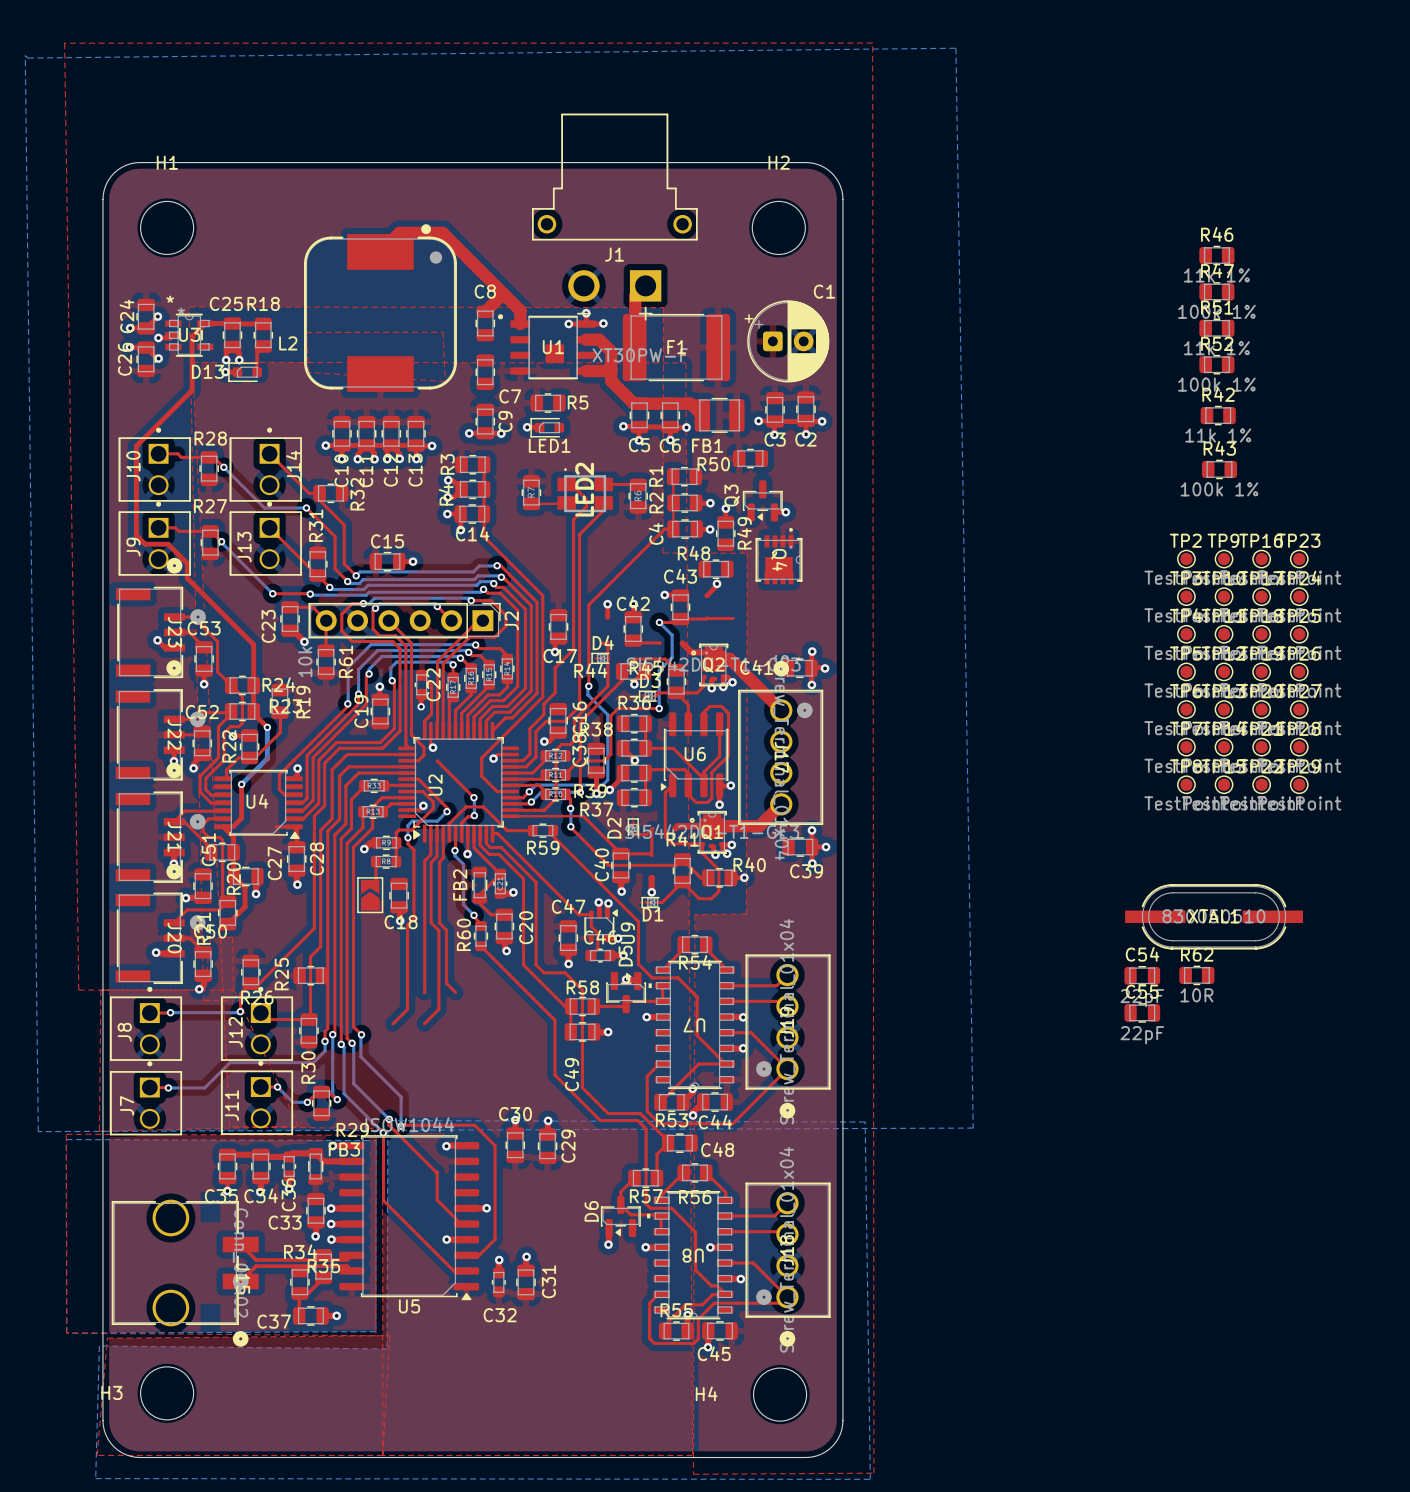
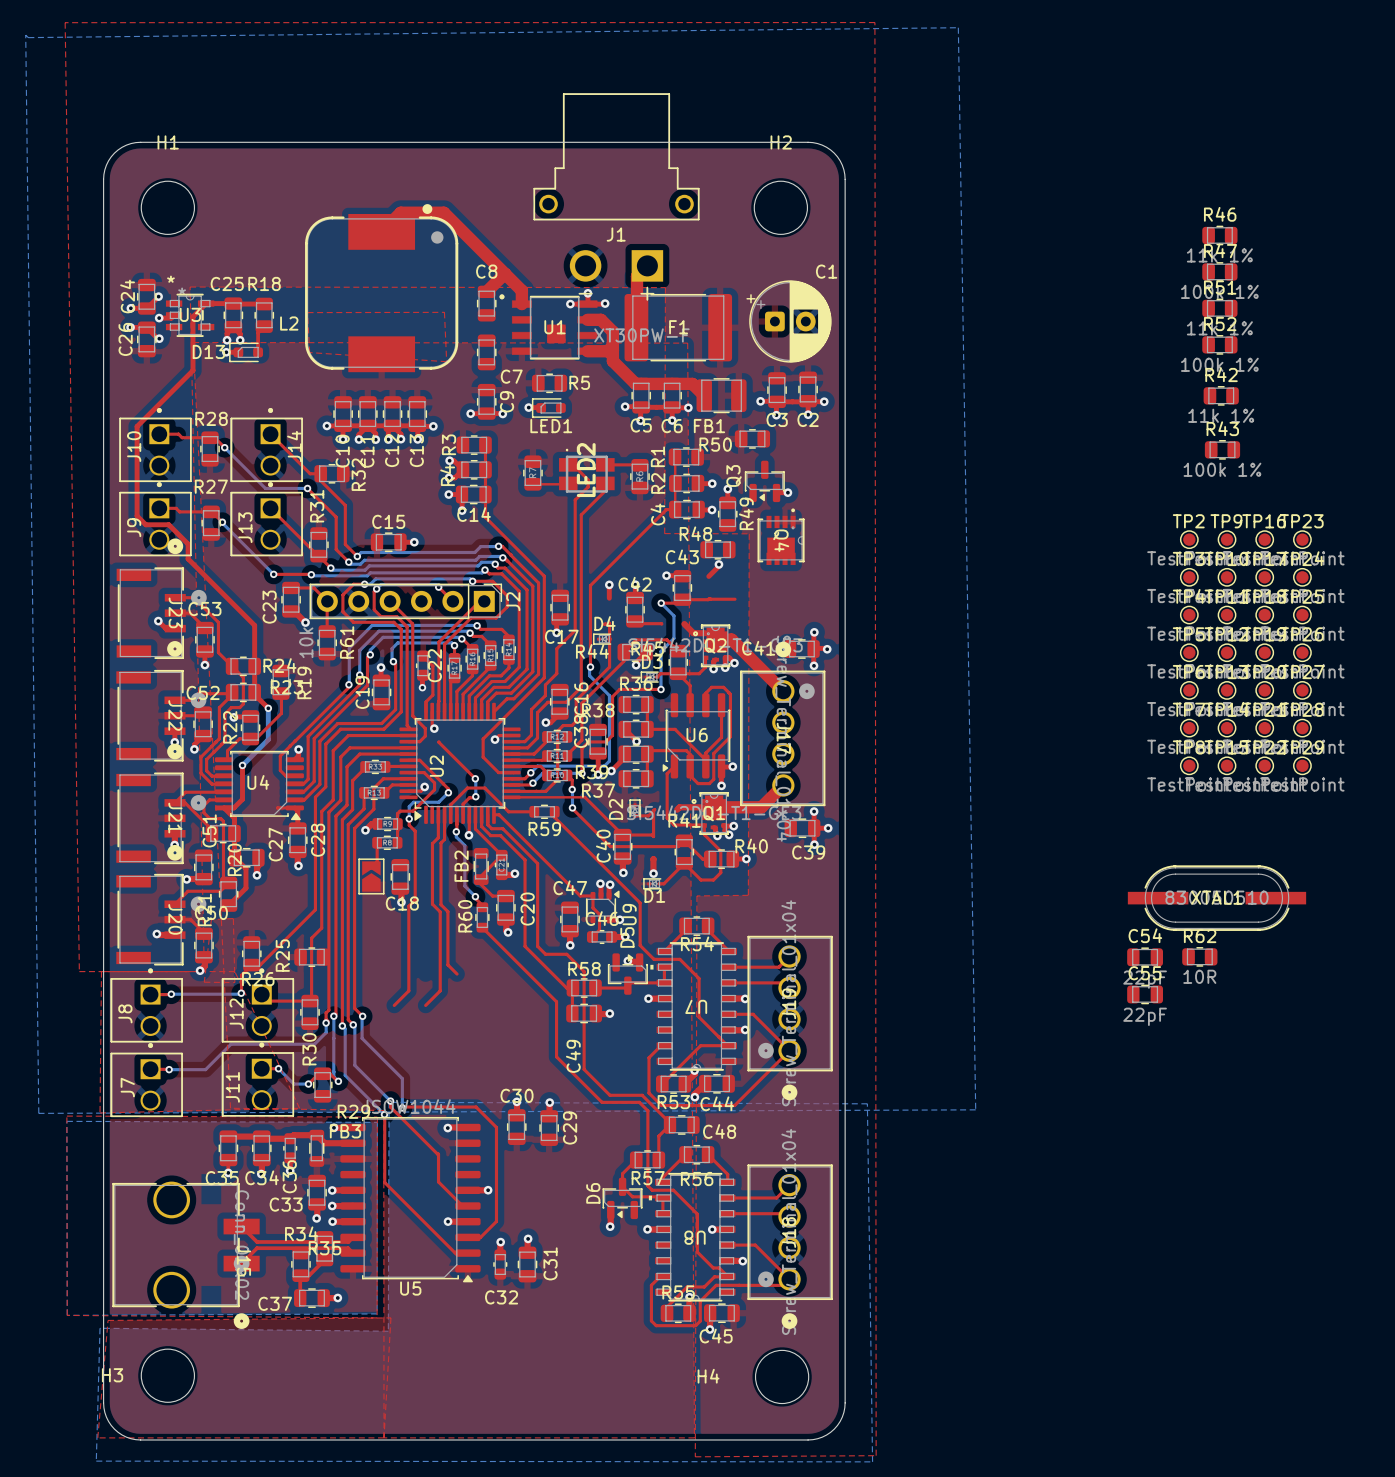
top track: (430, 833) (430, 854) (424, 860) (424, 992) -> none

